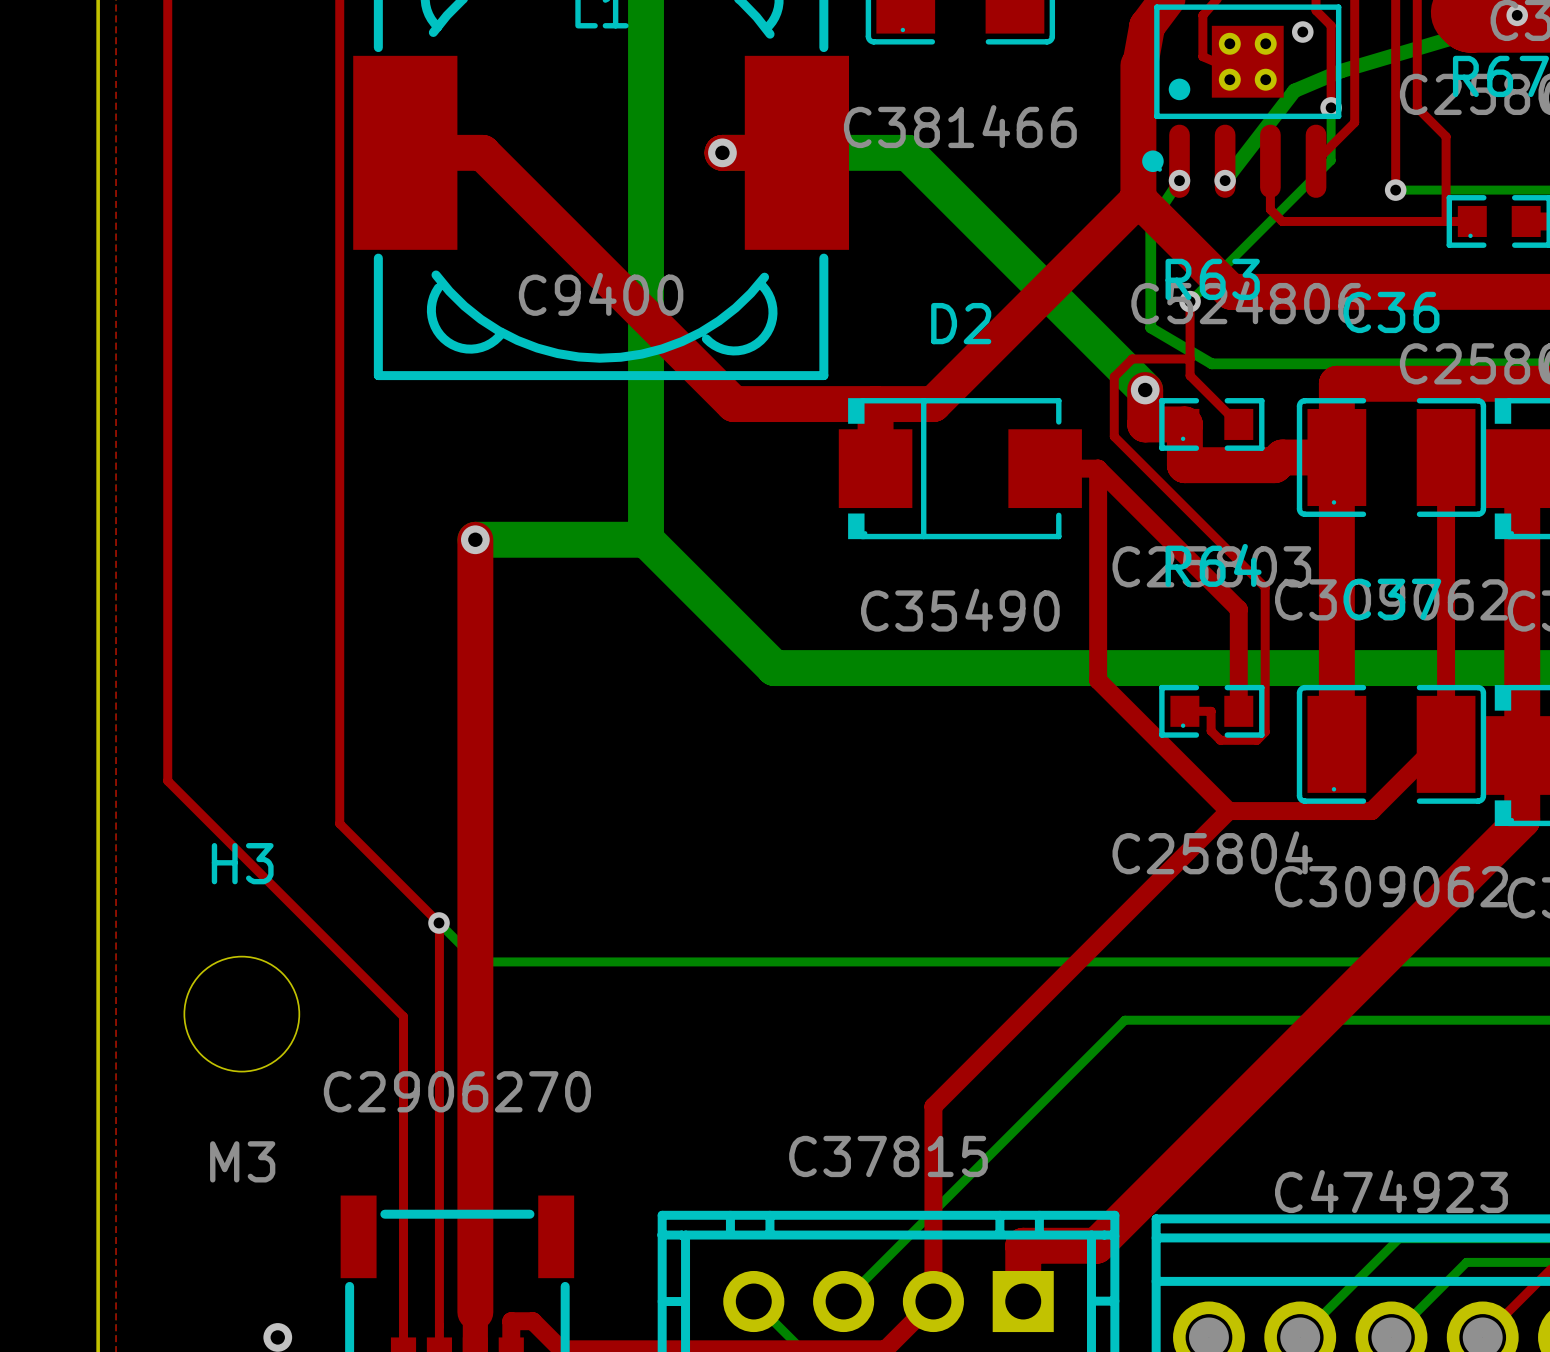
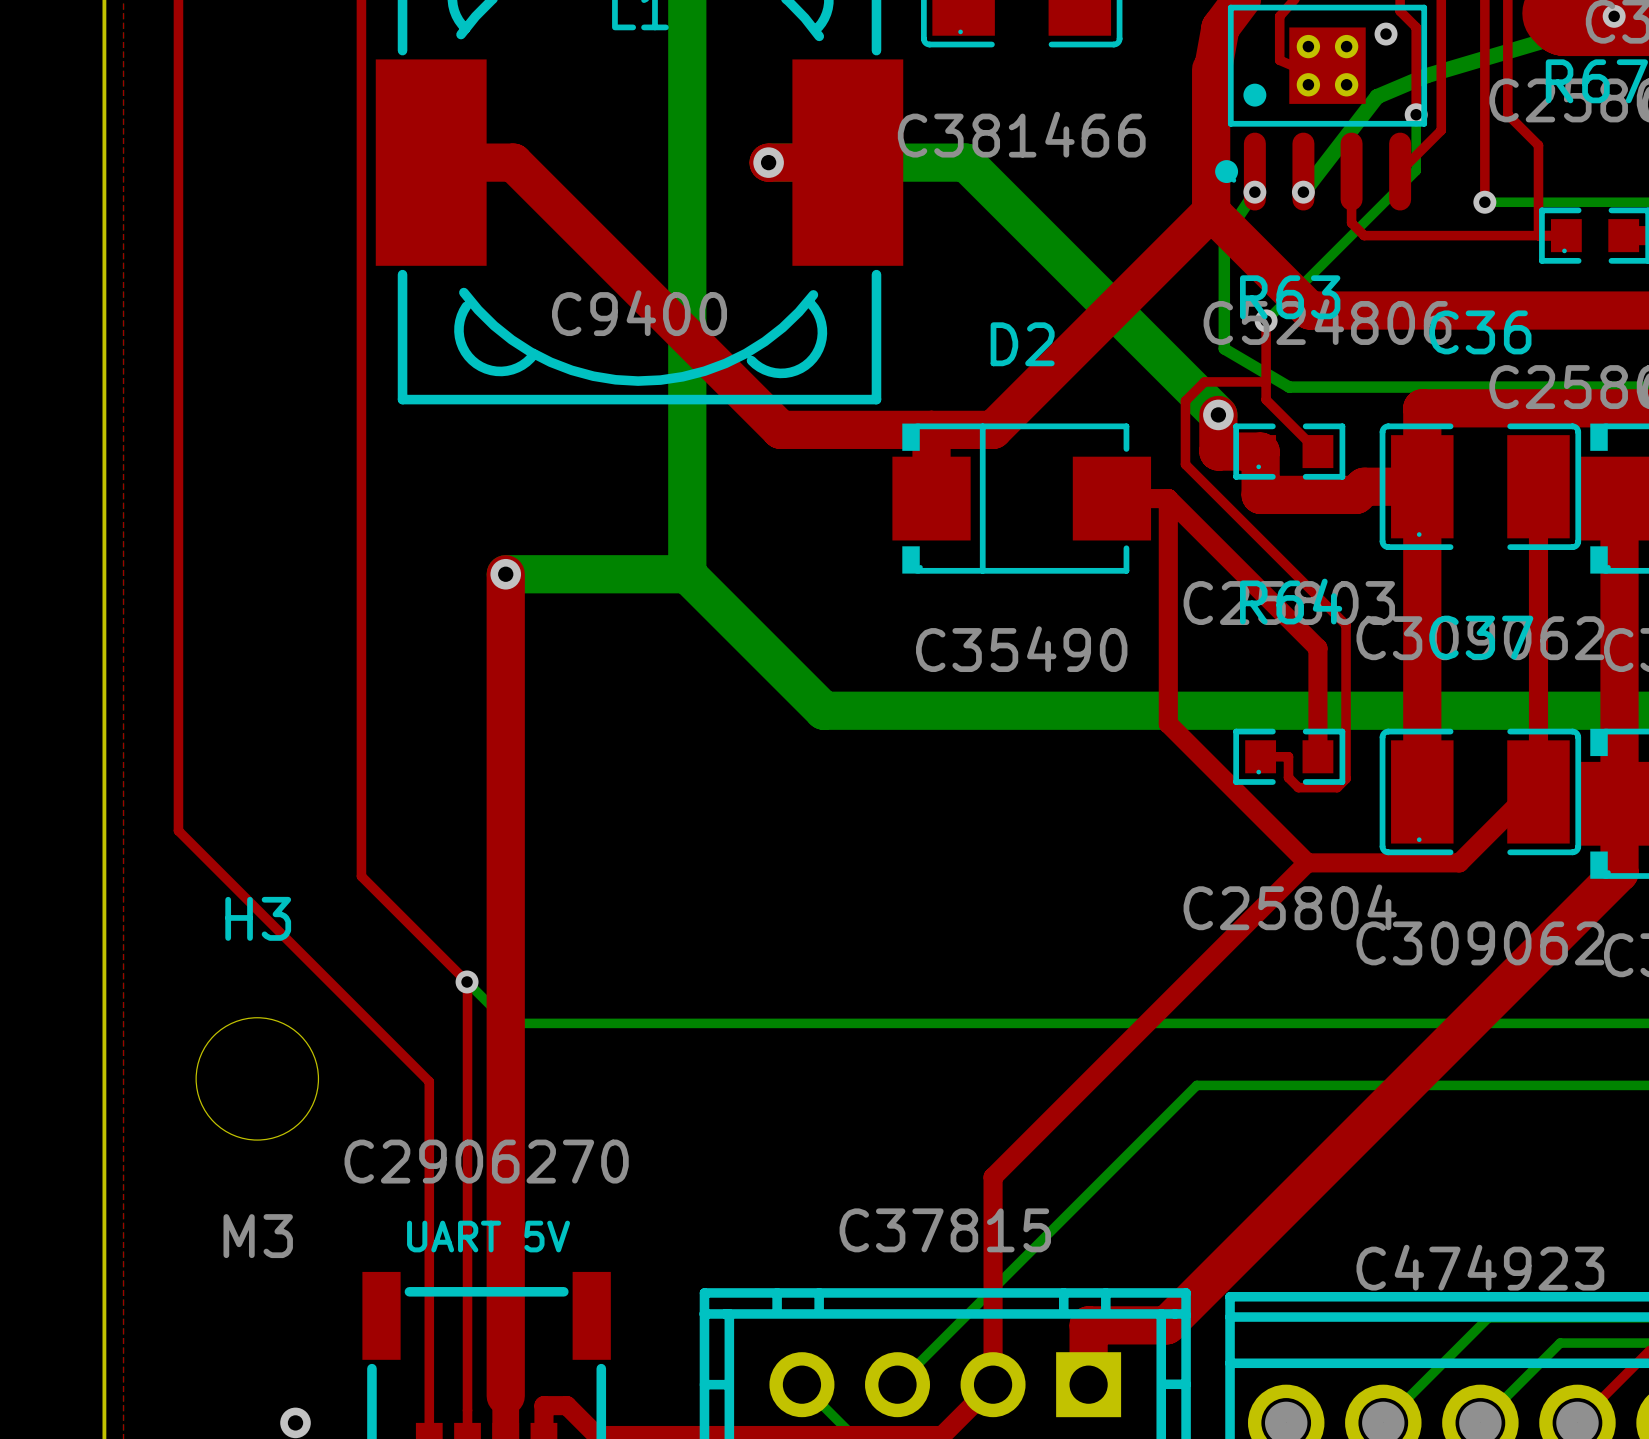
text: none -> UART 5V (488, 1236)

